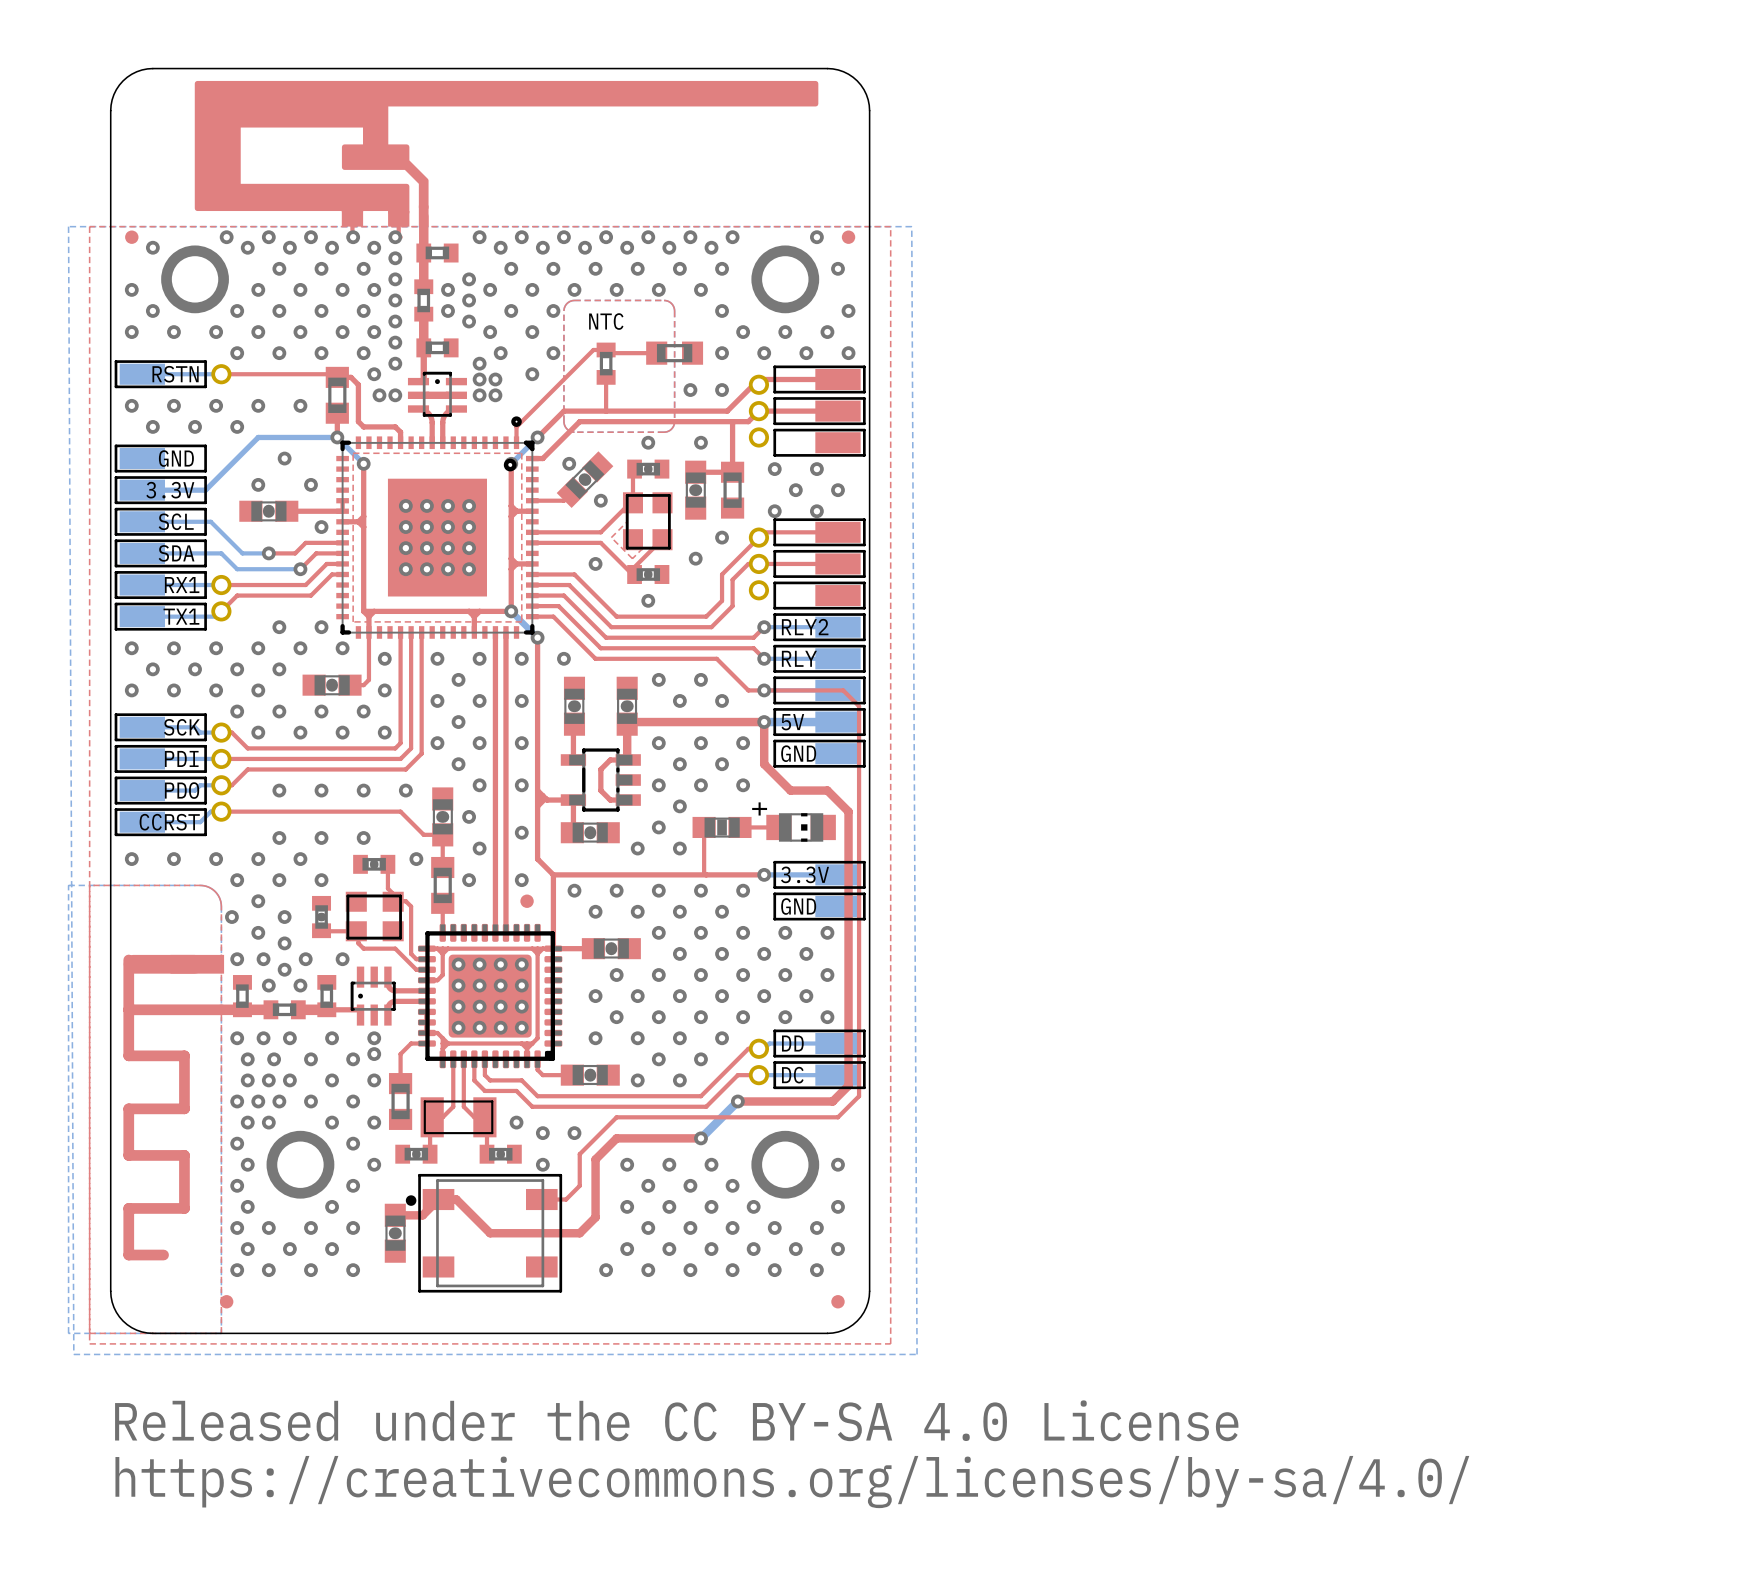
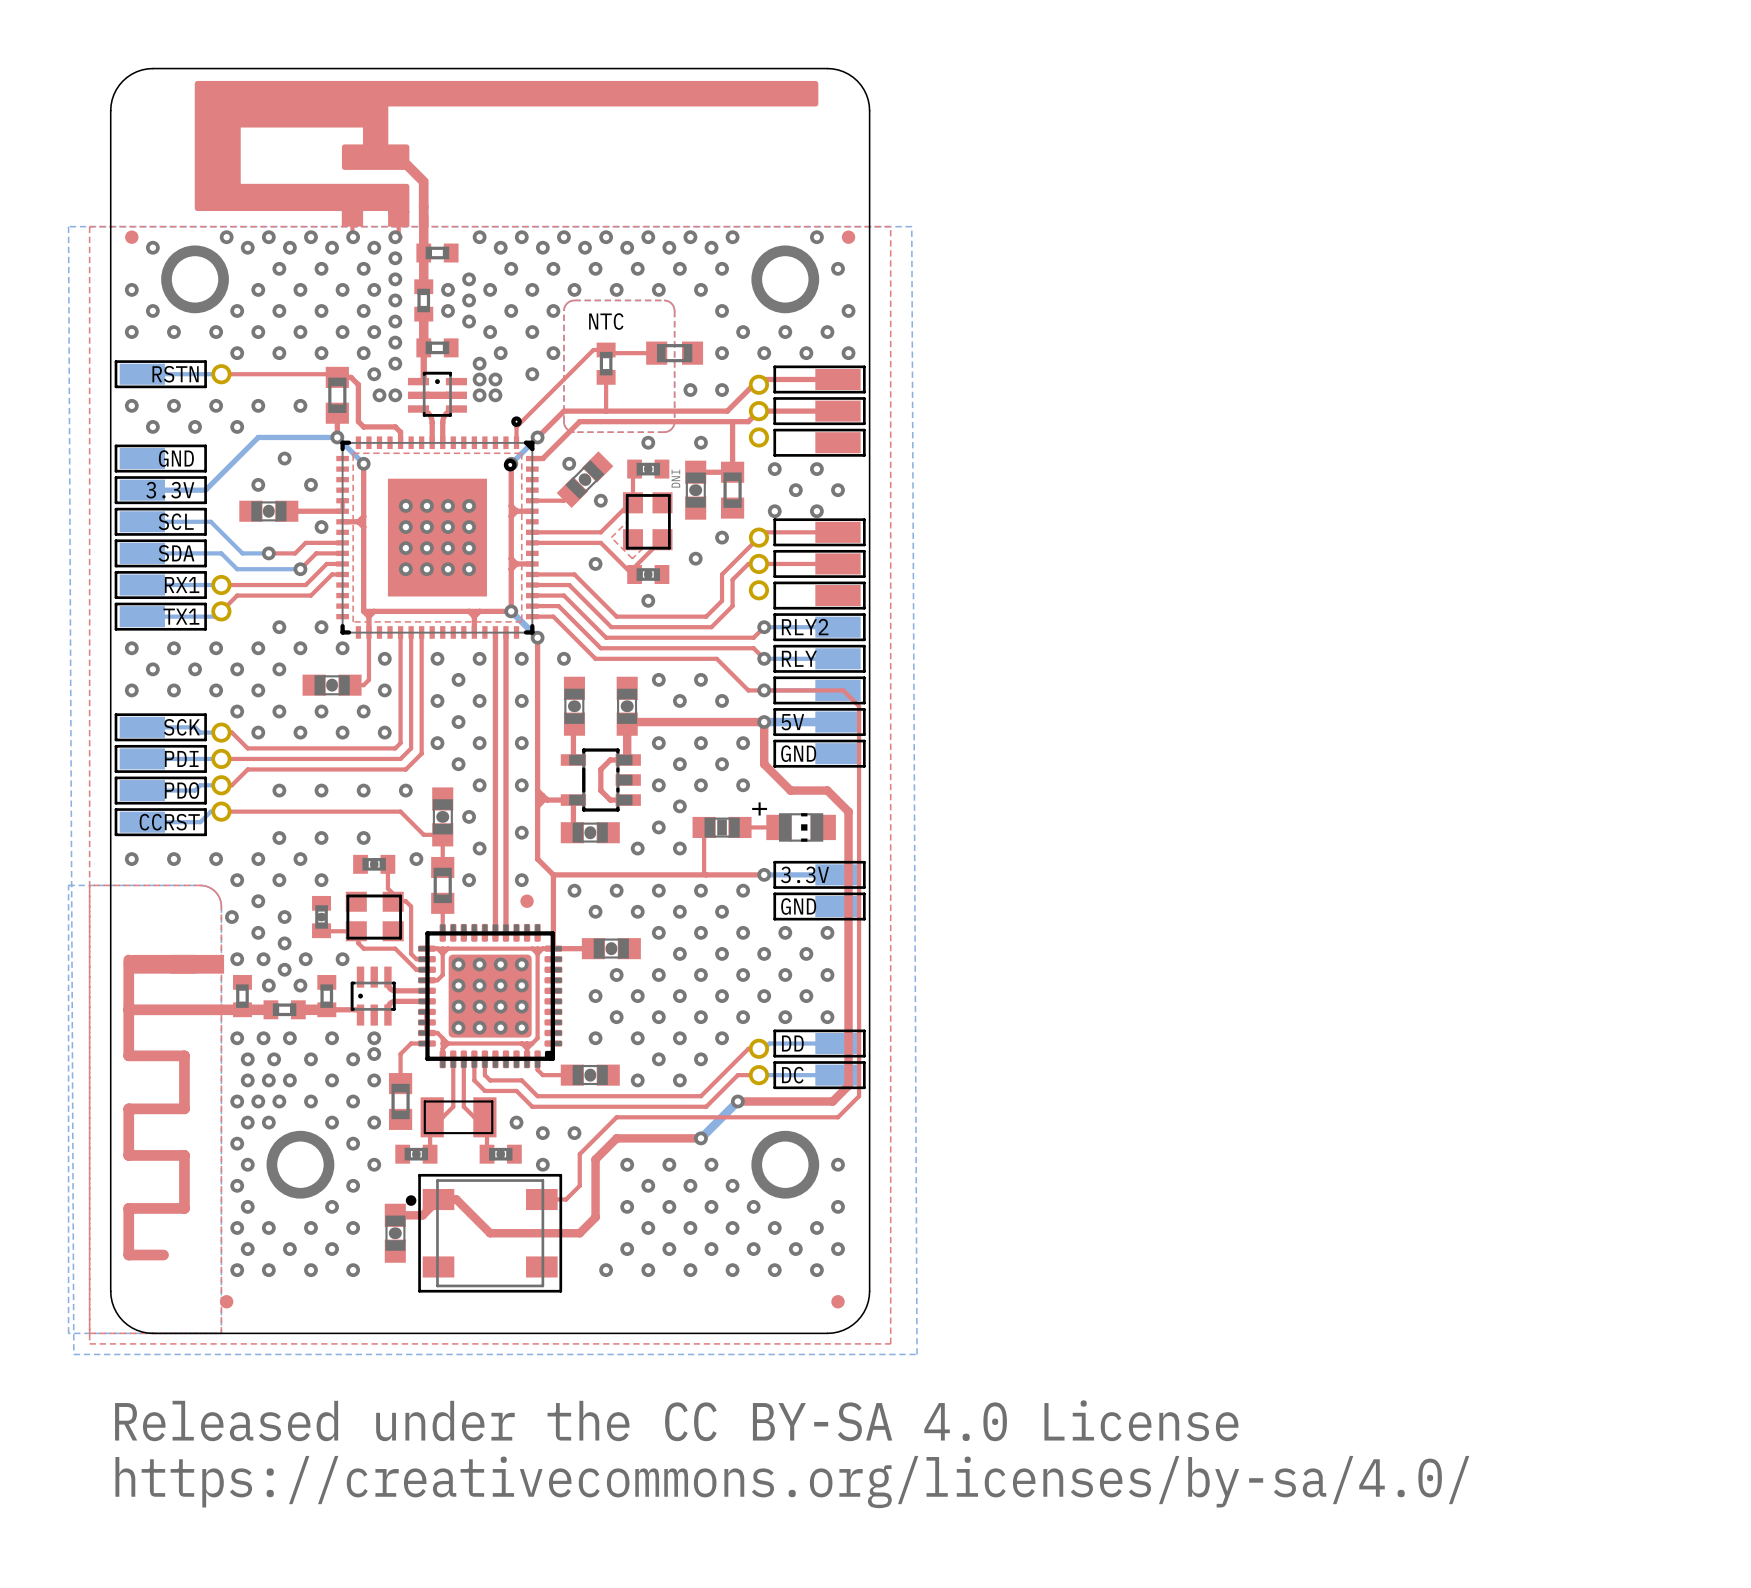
part value: none -> DNI (675, 478)

